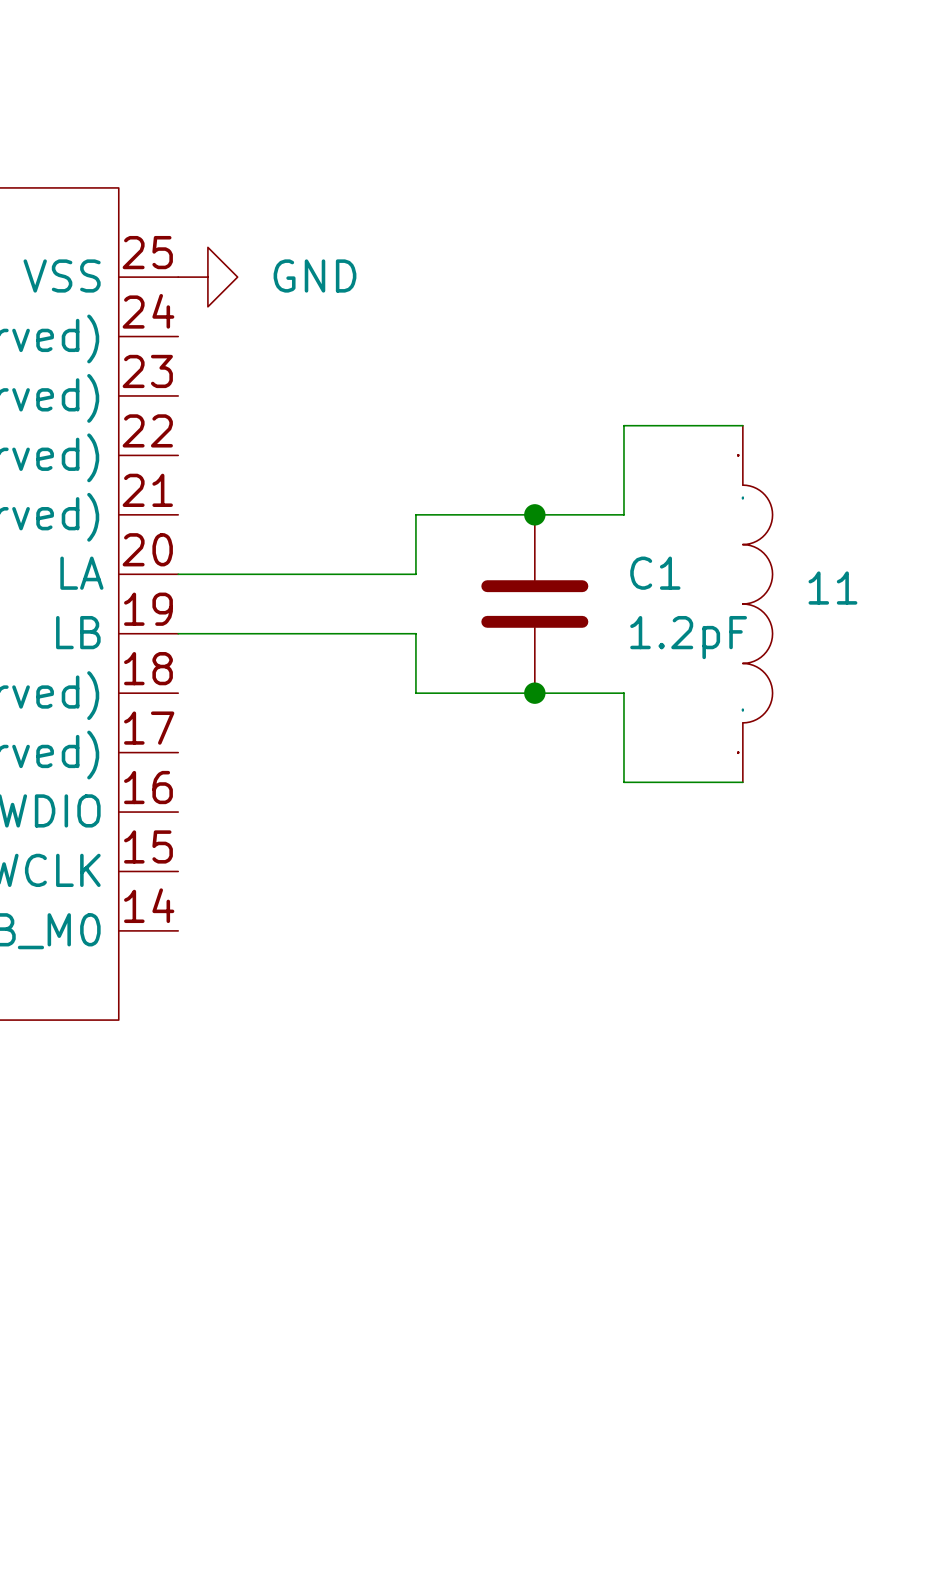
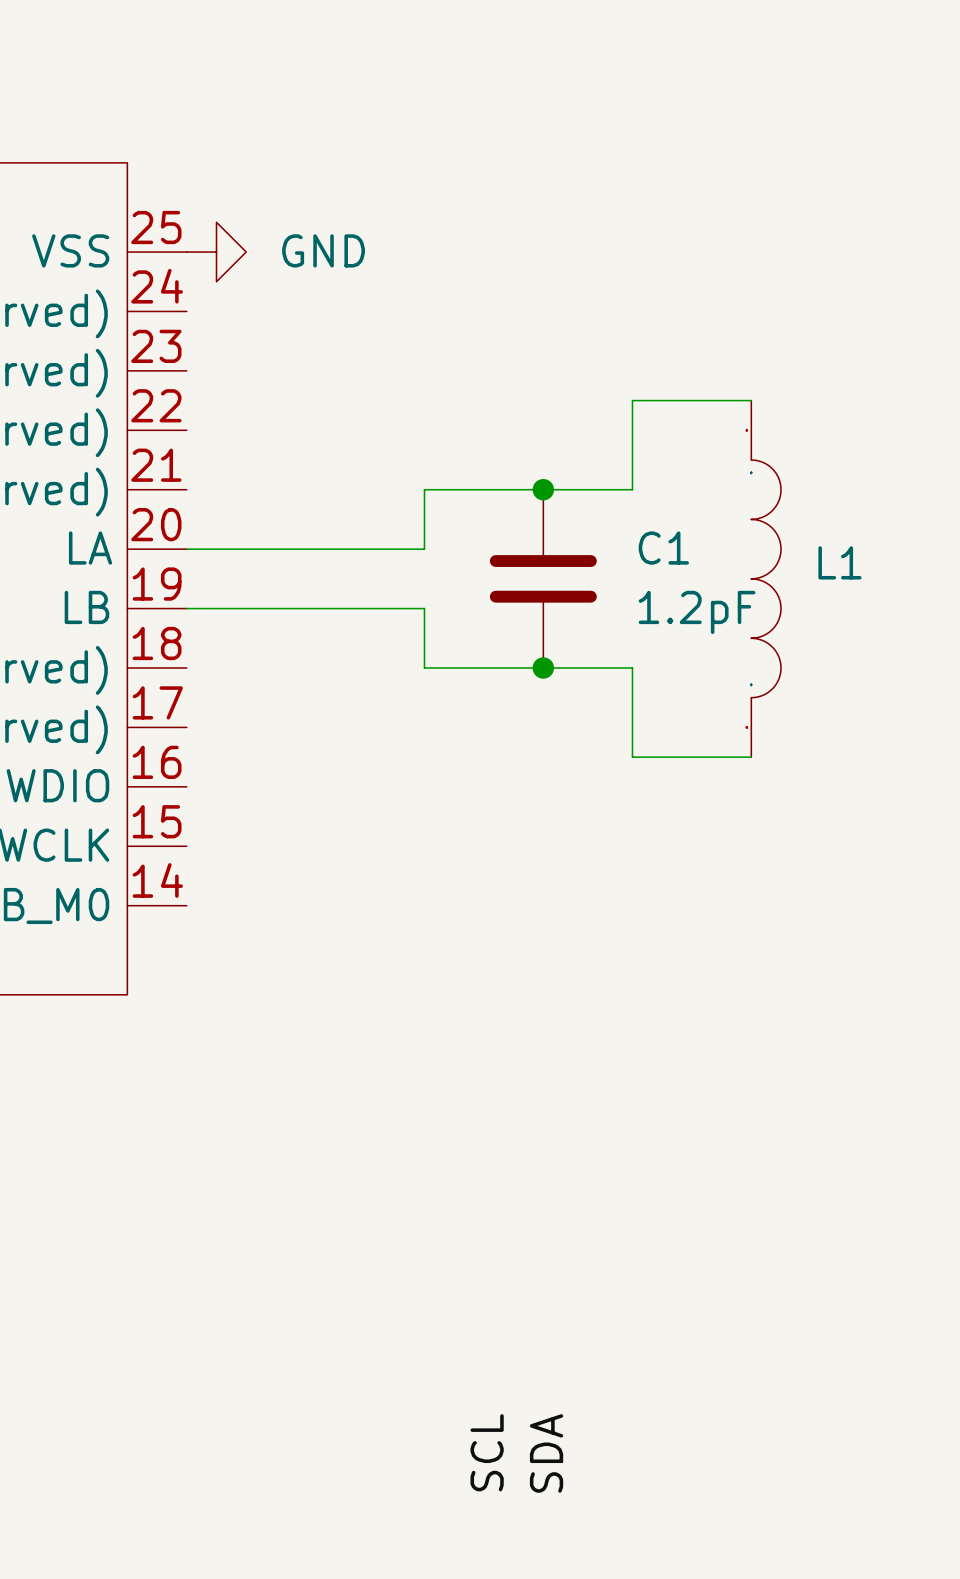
11 name: 11 (832, 588) -> L1 (839, 562)
label: none -> SCL (487, 1452)
label: none -> SDA (546, 1453)

